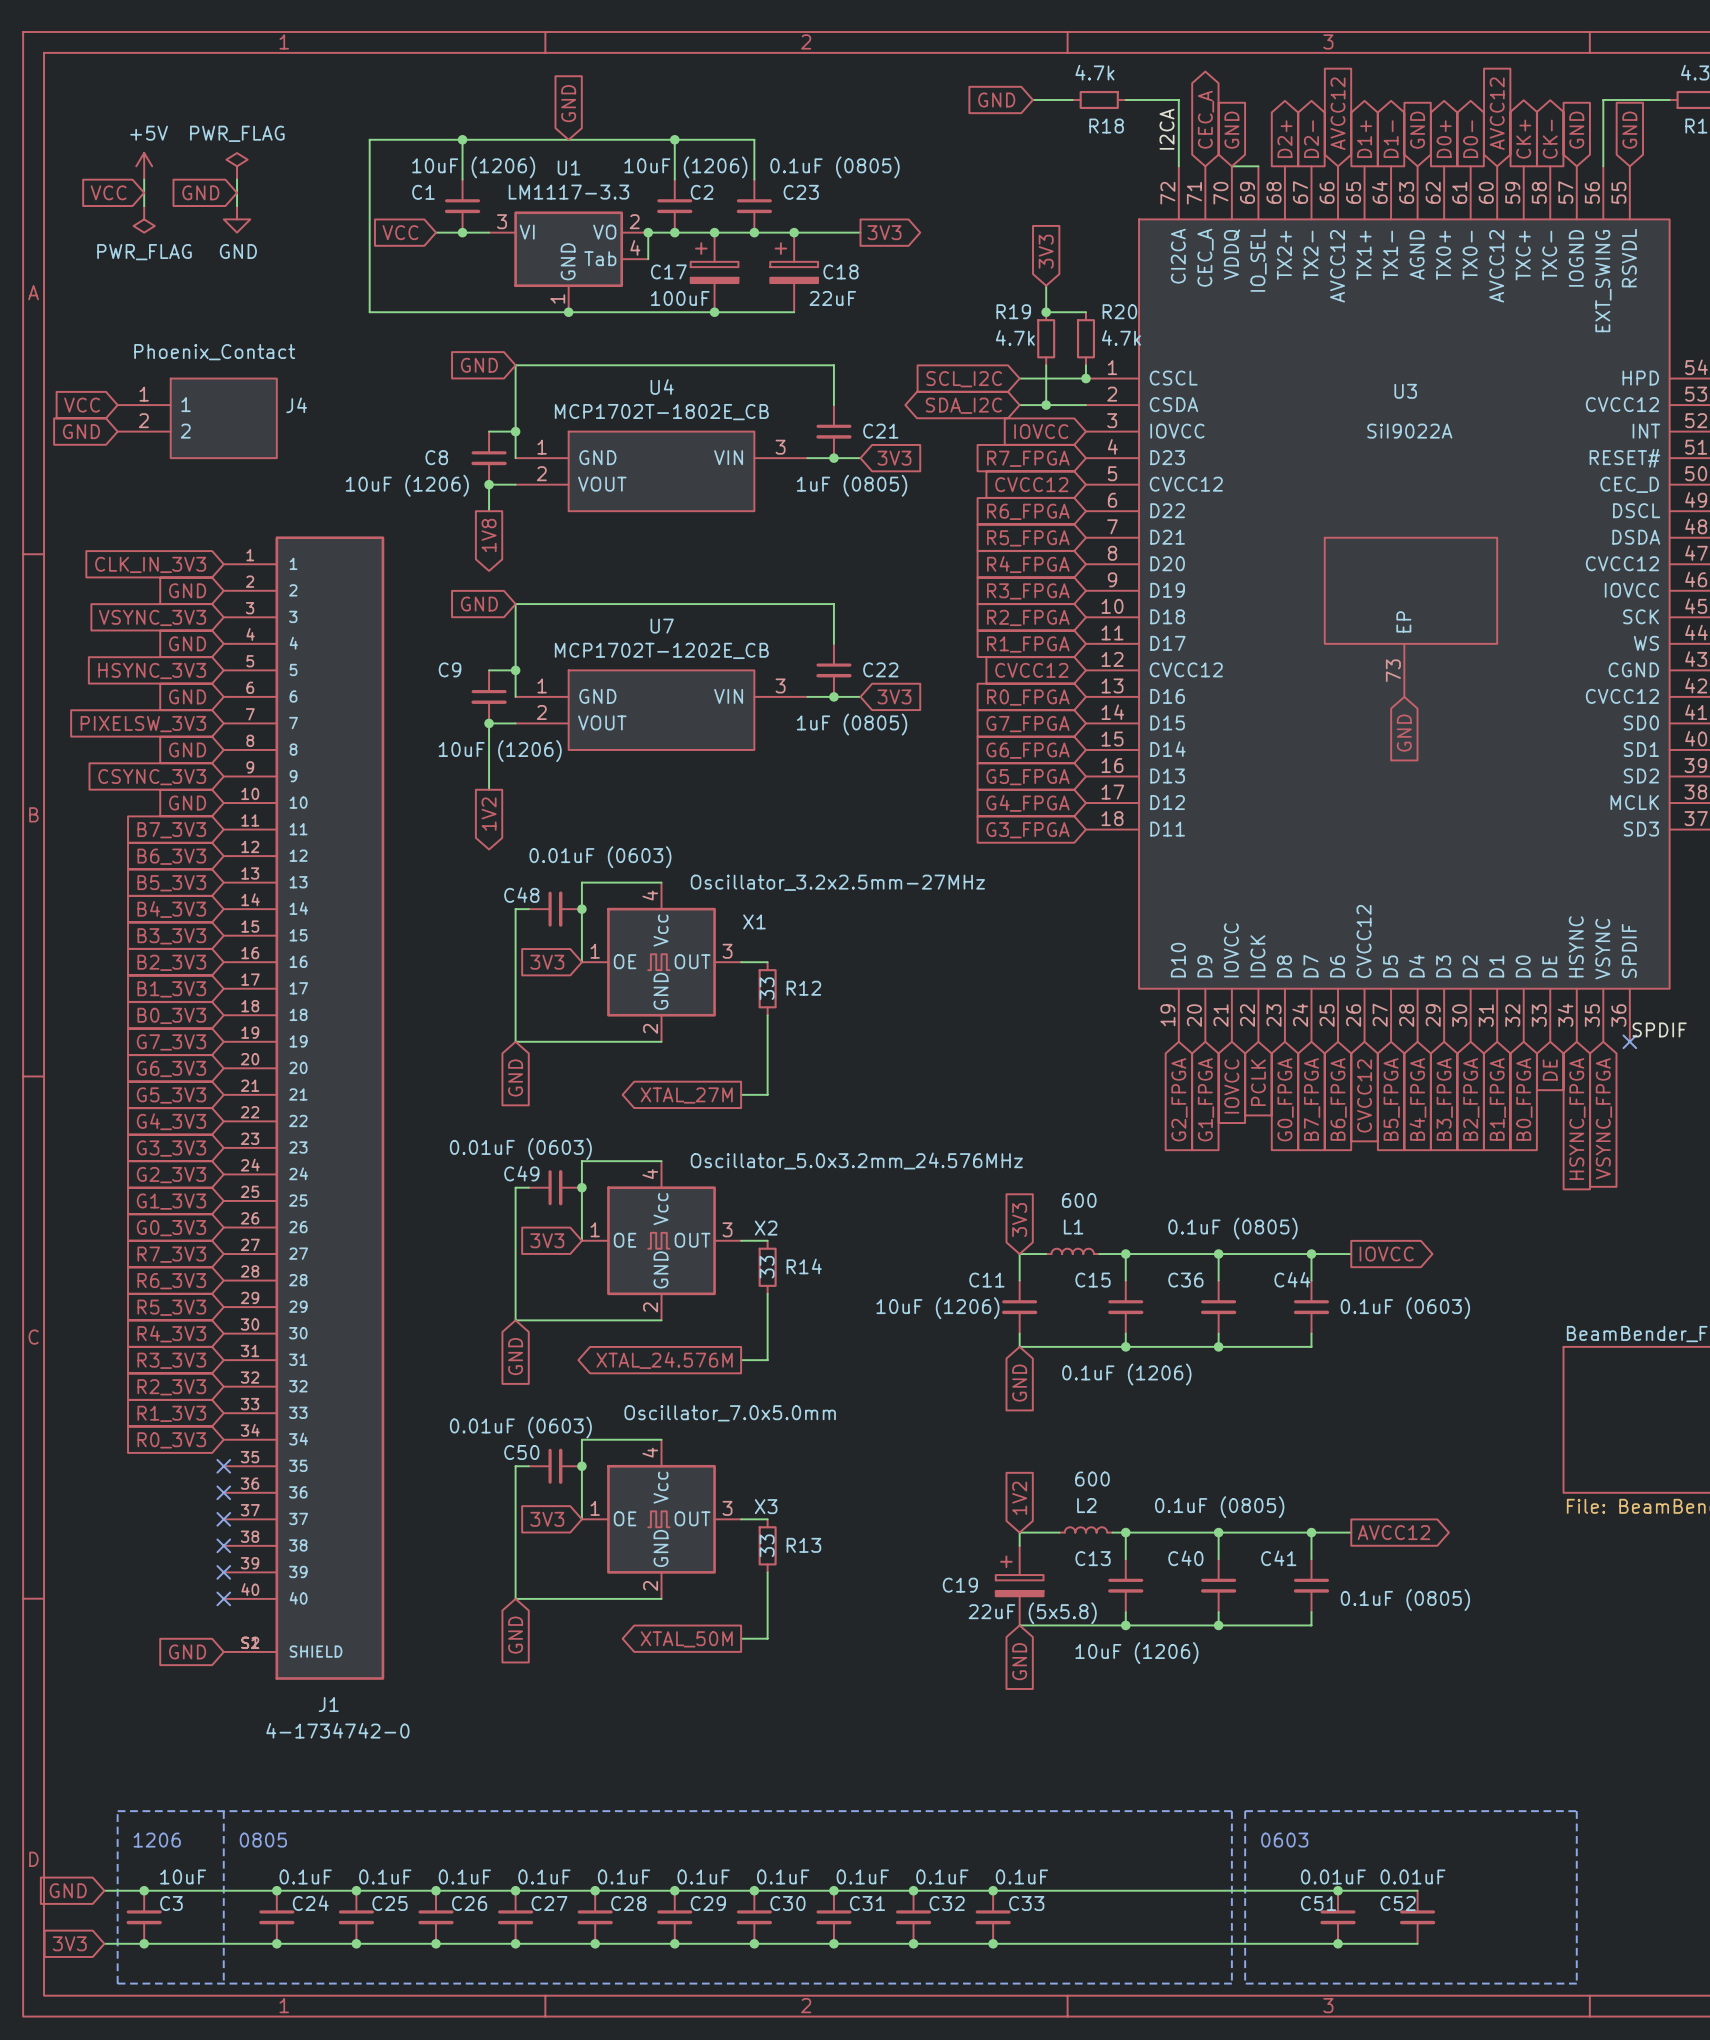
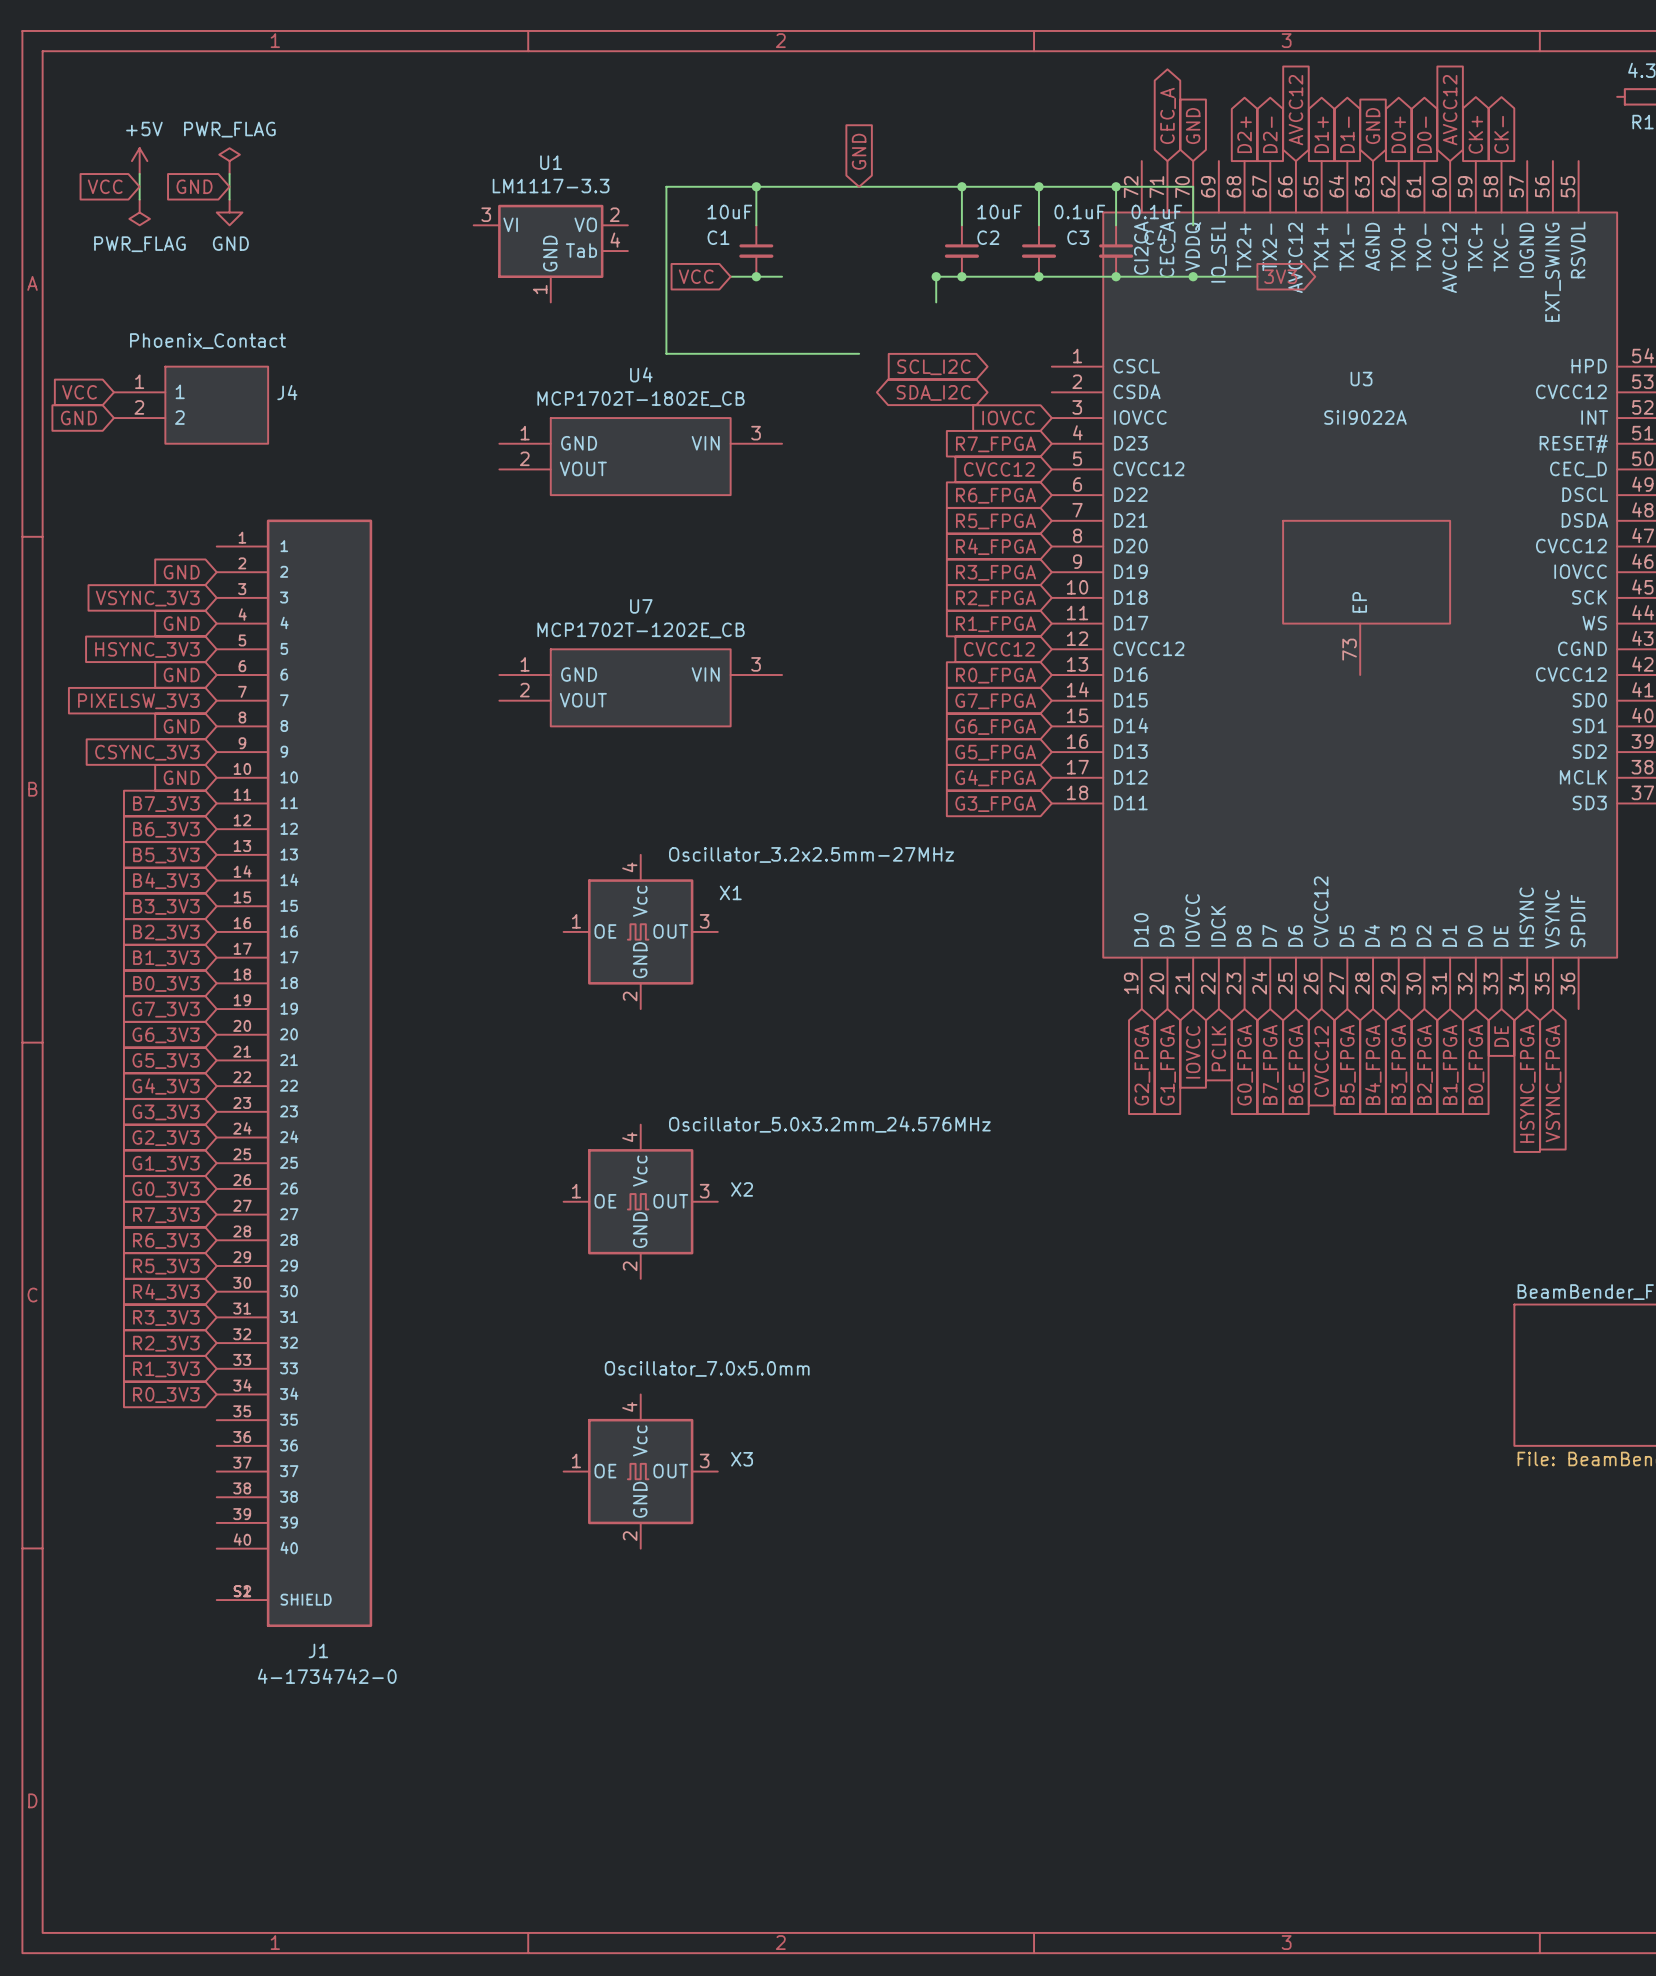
global label: GND (996, 99) -> none
wire: (1032, 99) (1072, 99) -> none
R18: 4.7k (1099, 99) -> none
wire: (1125, 99) (1178, 99) (1178, 166) -> none
wire: (1669, 99) (1603, 99) (1603, 166) -> none
global label: GND (568, 103) -> none
label: I2CA (1167, 129) -> none
global label: GND (1576, 130) -> none
global label: GND (1629, 130) -> none
wire: (462, 139) (462, 179) -> none
junction: (462, 139) -> none
wire: (674, 139) (674, 179) -> (756, 186) (756, 225)
junction: (674, 139) -> none
global label: none -> GND (859, 151)
wire: (1231, 166) (1258, 166) -> none
C1 value: 10uF (1206) (473, 167) -> 10uF (729, 212)
C2 value: 10uF (1206) (685, 167) -> 10uF (999, 212)
wire: (754, 179) (754, 139) (369, 139) (369, 312) (794, 312) -> none
junction: none -> (756, 186)
junction: none -> (961, 186)
wire: none -> (1038, 186) (1038, 225)
junction: none -> (1038, 186)
wire: none -> (1116, 186) (1116, 225)
junction: none -> (1116, 186)
C1 position: (462, 206) -> (756, 251)
C2 position: (674, 206) -> (961, 251)
C23: 0.1uF (0805) (754, 206) -> none
global label: VCC (400, 232) -> none
wire: (436, 232) (489, 232) -> none
junction: (462, 232) -> none
junction: (648, 232) -> none
junction: (674, 232) -> none
junction: (714, 232) -> none
junction: (754, 232) -> none
junction: (794, 232) -> none
wire: (860, 232) (648, 232) (648, 259) -> none
global label: 3V3 (884, 232) -> none
global label: 3V3 (1046, 251) -> none
C4: none -> 0.1uF (1116, 251)
C17: 100uF (714, 272) -> none
C18: 22uF (794, 272) -> none
global label: none -> VCC (696, 276)
junction: none -> (756, 276)
junction: none -> (936, 276)
junction: none -> (961, 276)
wire: (1046, 285) (1046, 312) (1085, 312) -> none
junction: none -> (1038, 276)
junction: none -> (1116, 276)
junction: none -> (1193, 276)
wire: none -> (1257, 276) (936, 276) (936, 302)
global label: none -> 3V3 (1280, 276)
junction: (568, 312) -> none
junction: (714, 312) -> none
junction: (1046, 312) -> none
R19: 4.7k (1046, 338) -> none
R20: 4.7k (1085, 338) -> none
global label: GND (479, 365) -> none
wire: (688, 365) (515, 365) (515, 458) -> (666, 353) (666, 186) (1193, 186) (1193, 225)
wire: (833, 365) (833, 405) -> (807, 353) (859, 353)
wire: (1046, 365) (1046, 405) -> (961, 186) (961, 225)
wire: (1085, 365) (1085, 378) (1019, 378) -> none
junction: (1085, 378) -> none
wire: (1019, 405) (1085, 405) -> none
junction: (1046, 405) -> none
wire: (489, 431) (515, 431) -> none
junction: (515, 431) -> none
C21: 1uF (0805) (833, 431) -> none
C8: 10uF (1206) (489, 458) -> none
wire: (807, 458) (860, 458) -> (730, 276) (782, 276)
junction: (833, 458) -> none
global label: 3V3 (894, 458) -> none
junction: (489, 484) -> none
wire: (515, 484) (489, 484) (489, 511) -> none
global label: 1V8 (489, 535) -> none
global label: CLK_IN_3V3 (150, 564) -> none
global label: GND (479, 604) -> none
wire: (833, 643) (833, 604) (515, 604) (515, 696) -> none
wire: (489, 670) (515, 670) -> none
junction: (515, 670) -> none
C22: 1uF (0805) (833, 670) -> none
C9: 10uF (1206) (489, 696) -> none
wire: (807, 696) (860, 696) -> none
junction: (833, 696) -> none
global label: 3V3 (894, 696) -> none
junction: (489, 723) -> none
wire: (515, 723) (489, 723) (489, 789) -> none
global label: GND (1404, 733) -> none
global label: 1V2 (489, 814) -> none
wire: (661, 882) (581, 882) (581, 962) -> none
wire: (528, 909) (515, 909) (515, 1041) (661, 1041) -> none
C48: 0.01uF (0603) (555, 909) -> none
junction: (581, 909) -> none
global label: 3V3 (547, 962) -> none
wire: (741, 962) (767, 962) -> none
R12: 33 (767, 988) -> none
wire: (767, 1015) (767, 1094) (741, 1094) -> none
label: SPDIF (1659, 1029) -> none
no-connect mark: (1629, 1041) -> none
global label: GND (515, 1077) -> none
global label: XTAL_27M (686, 1095) -> none
wire: (661, 1161) (581, 1161) (581, 1240) -> none
wire: (528, 1187) (515, 1187) (515, 1320) (661, 1320) -> none
C49: 0.01uF (0603) (555, 1187) -> none
junction: (581, 1187) -> none
global label: 3V3 (1019, 1220) -> none
global label: 3V3 (547, 1240) -> none
wire: (741, 1240) (767, 1240) -> none
L1: 600 (1072, 1251) -> none
wire: (1046, 1254) (1019, 1254) (1019, 1280) -> none
wire: (1099, 1254) (1351, 1254) -> none
wire: (1125, 1254) (1125, 1280) -> none
junction: (1125, 1254) -> none
wire: (1218, 1254) (1218, 1280) -> none
junction: (1218, 1254) -> none
wire: (1311, 1254) (1311, 1280) -> none
junction: (1311, 1254) -> none
global label: IOVCC (1386, 1254) -> none
R14: 33 (767, 1267) -> none
wire: (767, 1293) (767, 1360) (741, 1360) -> none
C11: 10uF (1206) (1019, 1307) -> none
C15: 0.1uF (1206) (1125, 1307) -> none
C36: 0.1uF (0805) (1218, 1307) -> none
C44: 0.1uF (0603) (1311, 1307) -> none
wire: (1019, 1333) (1019, 1346) (1311, 1346) (1311, 1333) -> none
wire: (1125, 1333) (1125, 1346) -> none
wire: (1218, 1333) (1218, 1346) -> none
junction: (1125, 1346) -> none
junction: (1218, 1346) -> none
global label: GND (515, 1356) -> none
global label: XTAL_24.576M (664, 1360) -> none
global label: GND (1019, 1383) -> none
wire: (661, 1439) (581, 1439) (581, 1519) -> none
no-connect mark: (223, 1466) -> none
wire: (528, 1466) (515, 1466) (515, 1598) (661, 1598) -> none
C50: 0.01uF (0603) (555, 1466) -> none
junction: (581, 1466) -> none
no-connect mark: (223, 1492) -> none
global label: 1V2 (1019, 1498) -> none
no-connect mark: (223, 1519) -> none
global label: 3V3 (547, 1519) -> none
wire: (741, 1519) (767, 1519) -> none
L2: 600 (1085, 1529) -> none
wire: (1059, 1532) (1019, 1532) (1019, 1545) -> none
wire: (1112, 1532) (1351, 1532) -> none
wire: (1125, 1532) (1125, 1559) -> none
junction: (1125, 1532) -> none
wire: (1218, 1532) (1218, 1559) -> none
junction: (1218, 1532) -> none
wire: (1311, 1532) (1311, 1559) -> none
junction: (1311, 1532) -> none
global label: AVCC12 (1393, 1532) -> none
no-connect mark: (223, 1545) -> none
R13: 33 (767, 1545) -> none
no-connect mark: (223, 1572) -> none
wire: (767, 1572) (767, 1638) (741, 1638) -> none
C19: 22uF (5x5.8) (1019, 1585) -> none
C13: 10uF (1206) (1125, 1585) -> none
C40: 0.1uF (0805) (1218, 1585) -> none
C41: 0.1uF (0805) (1311, 1585) -> none
no-connect mark: (223, 1598) -> none
wire: (1125, 1612) (1125, 1625) -> none
wire: (1218, 1612) (1218, 1625) -> none
wire: (1311, 1612) (1311, 1625) (1019, 1625) -> none
junction: (1125, 1625) -> none
junction: (1218, 1625) -> none
global label: GND (515, 1635) -> none
global label: XTAL_50M (686, 1639) -> none
global label: GND (187, 1651) -> none
global label: GND (1019, 1661) -> none
line: (117, 1811) (117, 1983) (1231, 1983) (1231, 1811) (117, 1811) -> none
line: (223, 1811) (223, 1983) -> none
line: (1245, 1811) (1245, 1983) (1576, 1983) (1576, 1811) (1245, 1811) -> none
text: 1206 (157, 1840) -> none
text: 0805 (263, 1840) -> none
text: 0603 (1284, 1840) -> none
C3 value: 10uF (183, 1876) -> 0.1uF (1079, 212)
global label: GND (68, 1890) -> none
wire: (104, 1890) (1417, 1890) -> none
junction: (144, 1890) -> none
junction: (276, 1890) -> none
junction: (356, 1890) -> none
junction: (436, 1890) -> none
junction: (515, 1890) -> none
junction: (595, 1890) -> none
junction: (674, 1890) -> none
junction: (754, 1890) -> none
junction: (833, 1890) -> none
junction: (913, 1890) -> none
junction: (993, 1890) -> none
junction: (1338, 1890) -> none
C3 name position: C3 (171, 1903) -> C3 (1078, 237)
C3 position: (144, 1917) -> (1038, 251)
C24: 0.1uF (276, 1917) -> none
C25: 0.1uF (356, 1917) -> none
C26: 0.1uF (436, 1917) -> none
C27: 0.1uF (515, 1917) -> none
C28: 0.1uF (595, 1917) -> none
C29: 0.1uF (674, 1917) -> none
C30: 0.1uF (754, 1917) -> none
C31: 0.1uF (833, 1917) -> none
C32: 0.1uF (913, 1917) -> none
C33: 0.1uF (993, 1917) -> none
C51: 0.01uF (1338, 1917) -> none
C52: 0.01uF (1417, 1917) -> none
global label: 3V3 (69, 1943) -> none
wire: (104, 1943) (1417, 1943) -> none
junction: (144, 1943) -> none
junction: (276, 1943) -> none
junction: (356, 1943) -> none
junction: (436, 1943) -> none
junction: (515, 1943) -> none
junction: (595, 1943) -> none
junction: (674, 1943) -> none
junction: (754, 1943) -> none
junction: (833, 1943) -> none
junction: (913, 1943) -> none
junction: (993, 1943) -> none
junction: (1338, 1943) -> none

